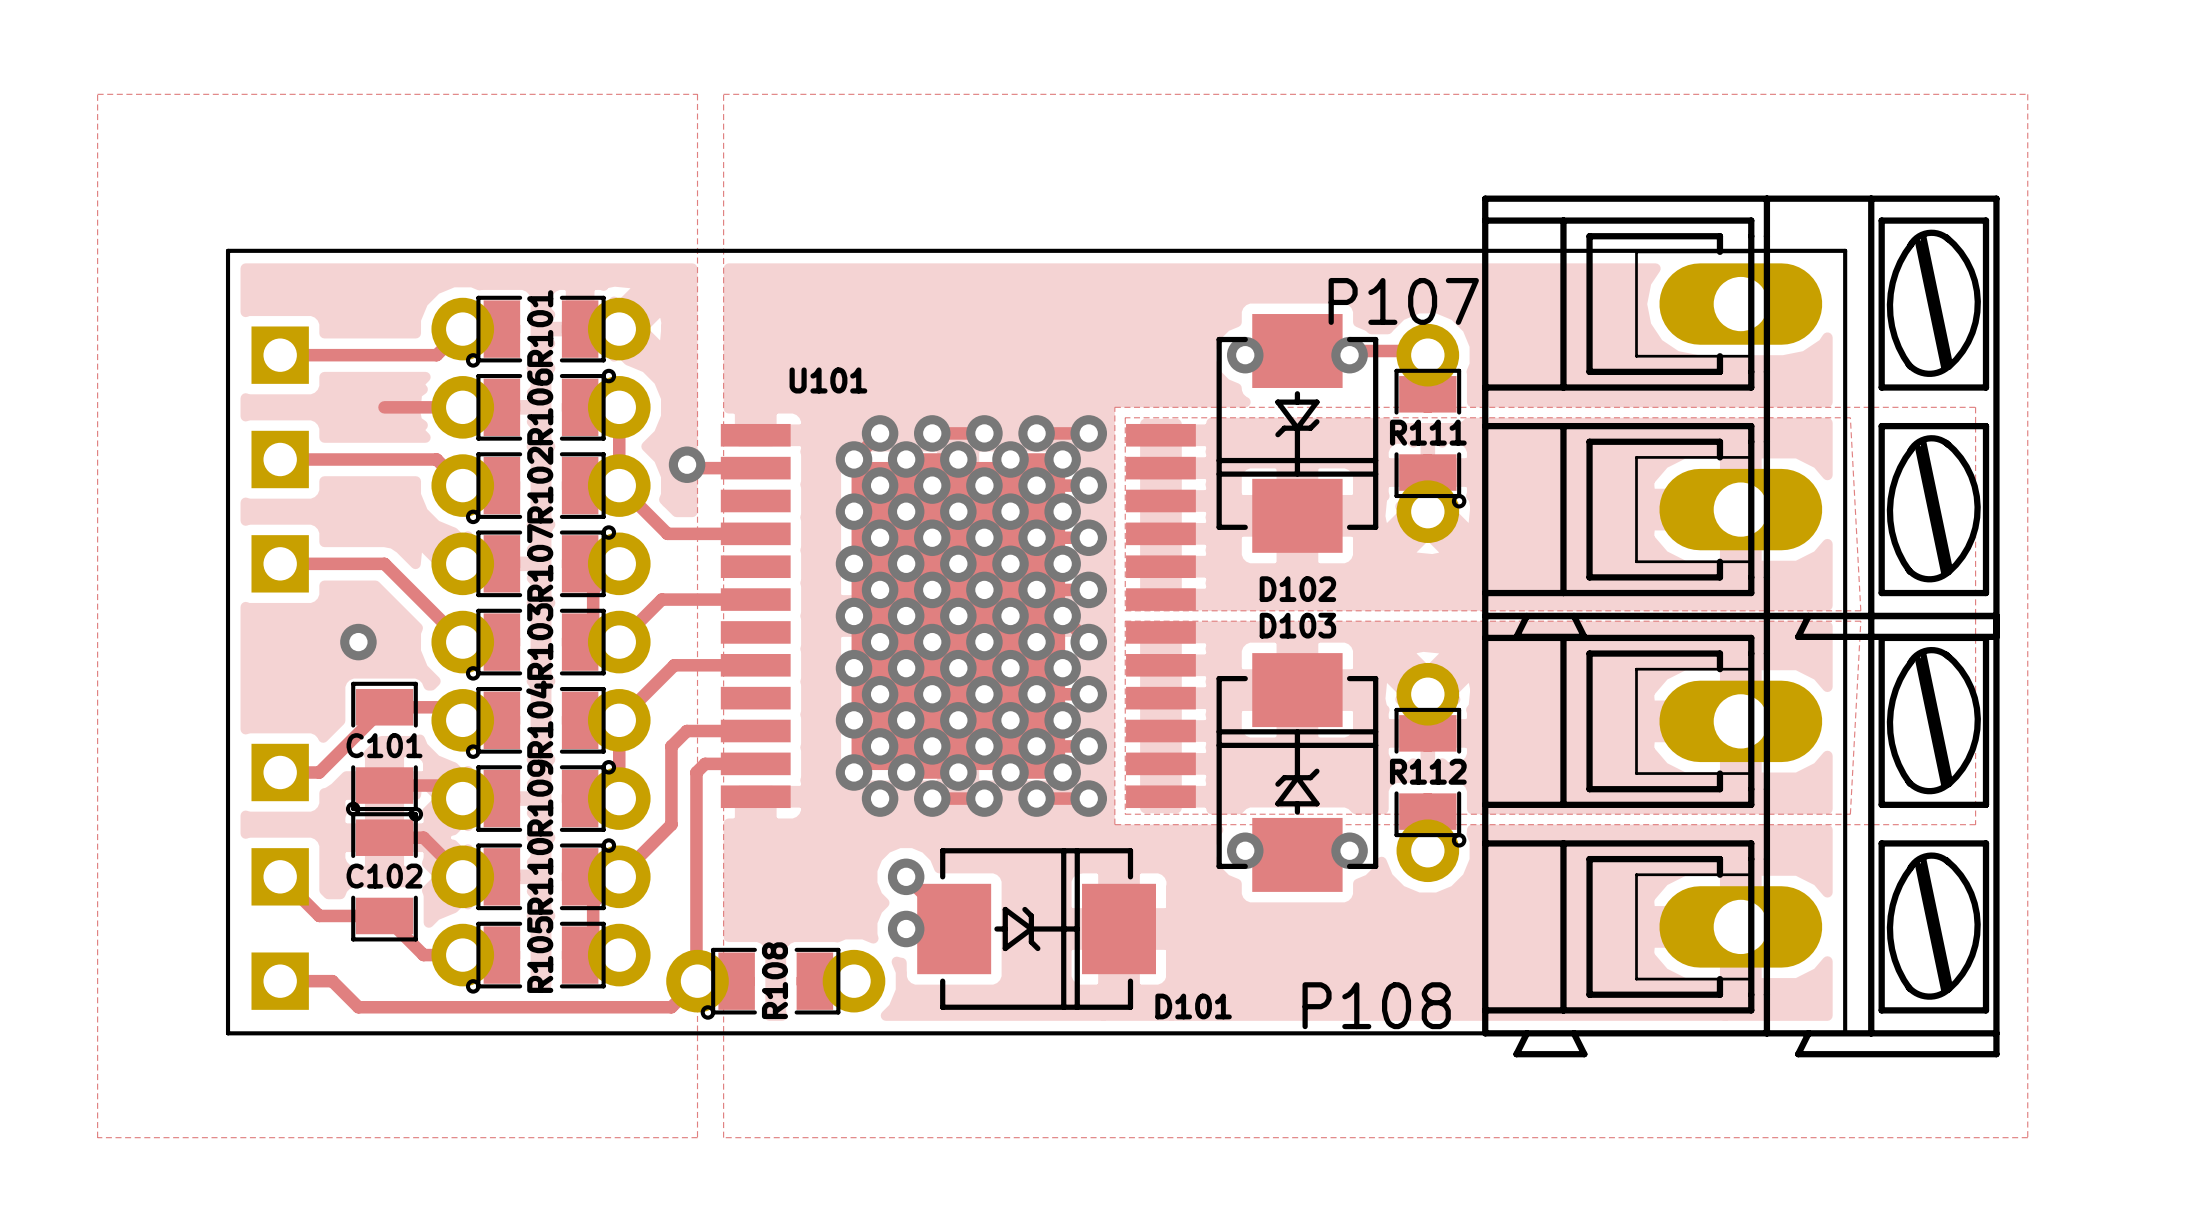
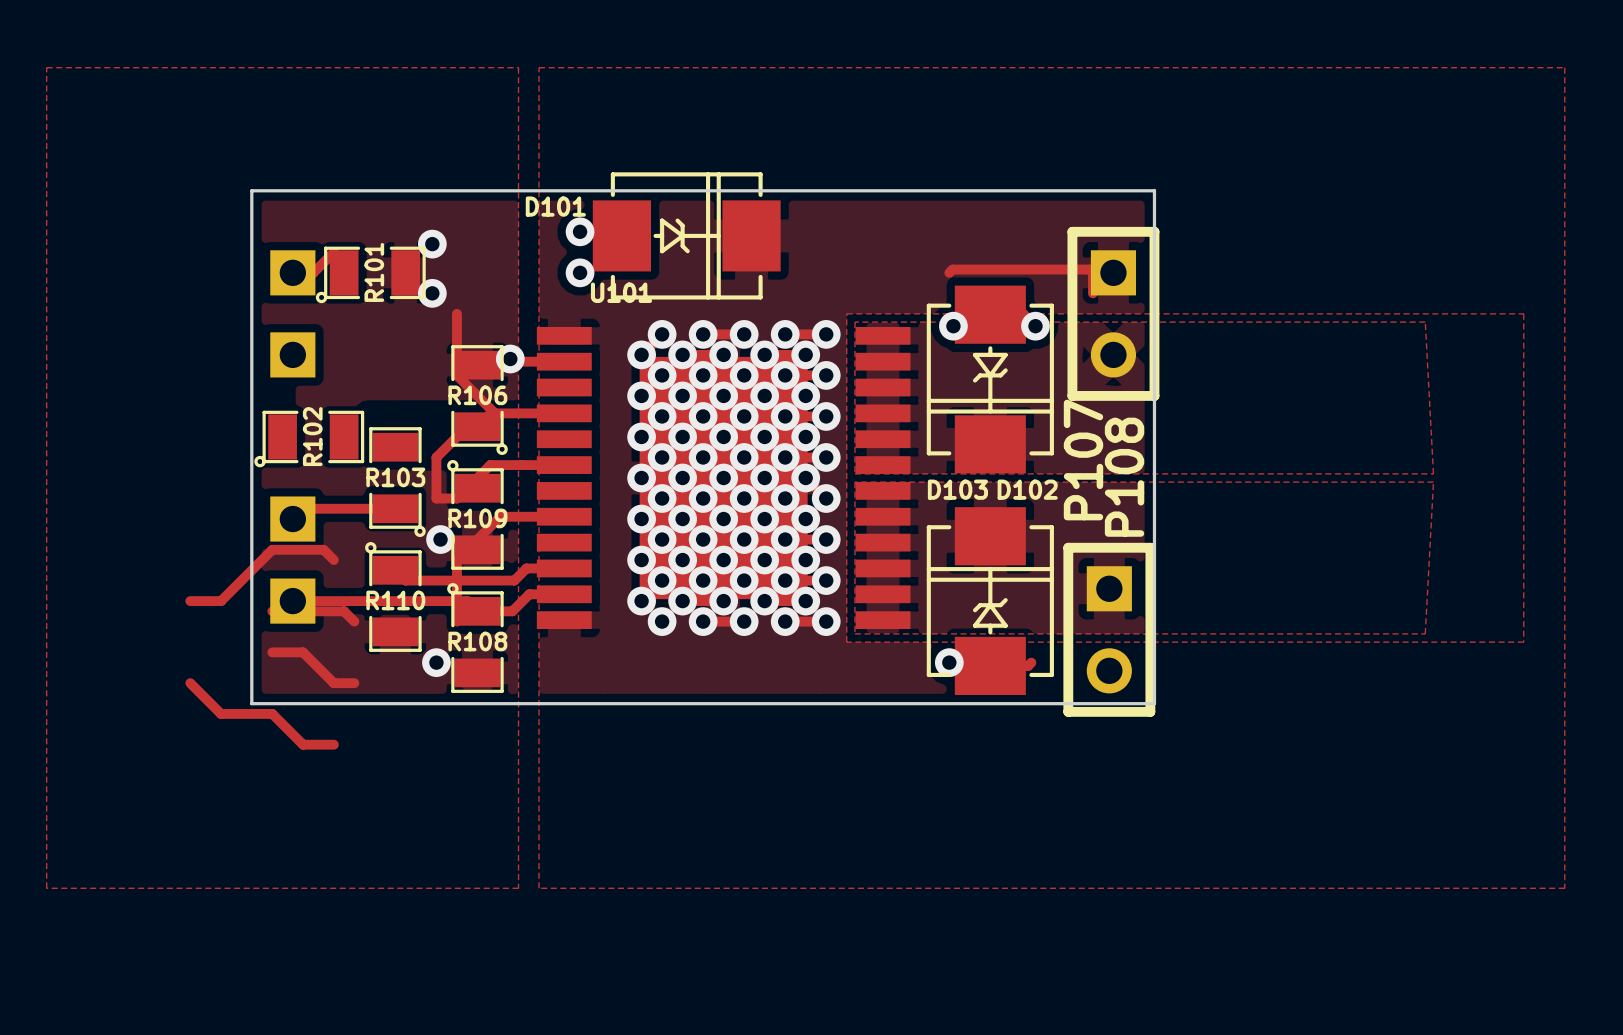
P107 footprint: [1482, 195, 2000, 641] -> [1067, 226, 1160, 401]
board edge: (358, 250) (228, 250) (228, 1033) (1845, 1033) (1845, 250) (1506, 250) -> (251, 190) (251, 703) (1154, 703) (1154, 190)
R101 footprint: [431, 295, 651, 368] -> [315, 246, 426, 304]
P107 name position: P107 (1403, 301) -> P107 (1083, 460)
via: none -> (580, 231)
via: none -> (432, 244)
track: (280, 355) (410, 355) -> none
part: (280, 355) -> none
part: none -> (292, 272)
via: none -> (580, 272)
via: (1245, 355) -> none
via: (1349, 355) -> none
R106 footprint: [431, 368, 651, 441] -> [451, 345, 508, 455]
via: none -> (432, 293)
track: (384, 407) (488, 407) -> none
via: none -> (953, 326)
via: none -> (1035, 326)
D102 position: (1297, 433) -> (990, 379)
R111: (1430, 433) -> none
R102 footprint: [431, 452, 651, 525] -> [254, 410, 365, 468]
track: (280, 459) (436, 459) (462, 485) -> none
part: (280, 459) -> none
part: none -> (292, 354)
R107: (541, 561) -> none
track: (280, 563) (384, 563) (462, 642) -> none
part: (280, 563) -> none
D102 name position: D102 (1297, 589) -> D102 (1027, 489)
R103 footprint: [431, 608, 651, 681] -> [369, 427, 426, 538]
P108 footprint: [1482, 612, 2000, 1058] -> [1063, 542, 1156, 717]
D103 name position: D103 (1297, 625) -> D103 (957, 489)
via: (358, 642) -> none
track: none -> (395, 508) (303, 508) (292, 519)
part: none -> (292, 519)
via: none -> (440, 539)
R104: (541, 722) -> none
track: (707, 731) (686, 731) (671, 746) (671, 824) (593, 902) (593, 955) -> (526, 568) (514, 580) (405, 580) (395, 570)
C101: (387, 751) -> none
R109 footprint: [431, 760, 651, 832] -> [447, 459, 504, 570]
track: (711, 763) (705, 763) (696, 772) (697, 981) (671, 1007) (358, 1007) (332, 981) (280, 981) -> (529, 594) (512, 611) (477, 611) (467, 601) (292, 601)
part: (280, 772) -> none
part: none -> (292, 601)
R112: (1430, 772) -> none
R110 footprint: [431, 838, 651, 911] -> [365, 542, 422, 652]
via: none -> (436, 662)
via: (1349, 850) -> none
C102: (381, 871) -> none
part: (280, 876) -> none
via: (906, 876) -> none
via: (906, 929) -> none
D101 position: (1036, 929) -> (686, 235)
R108 footprint: [666, 947, 886, 1020] -> [447, 583, 504, 693]
R105: (541, 957) -> none
part: (280, 981) -> none
P108 name position: P108 (1376, 1005) -> P108 (1124, 477)
D101 name position: D101 (1193, 1006) -> D101 (555, 206)

